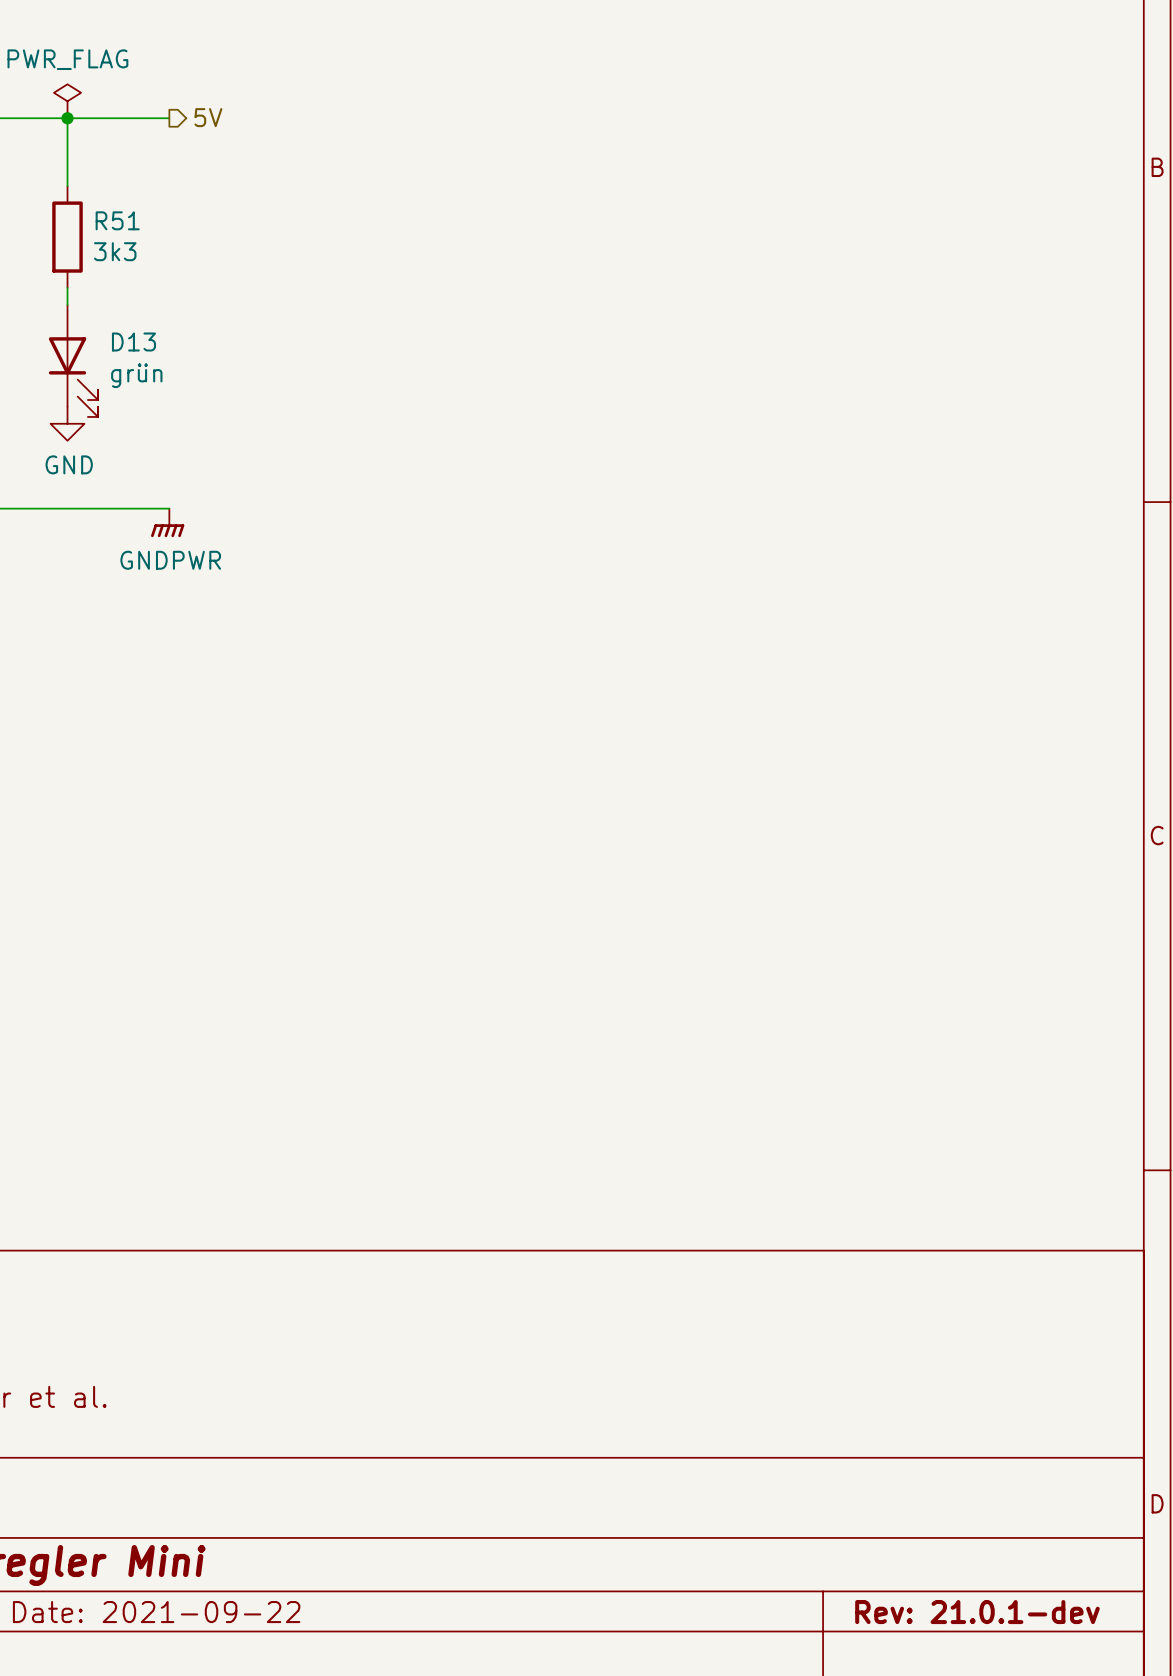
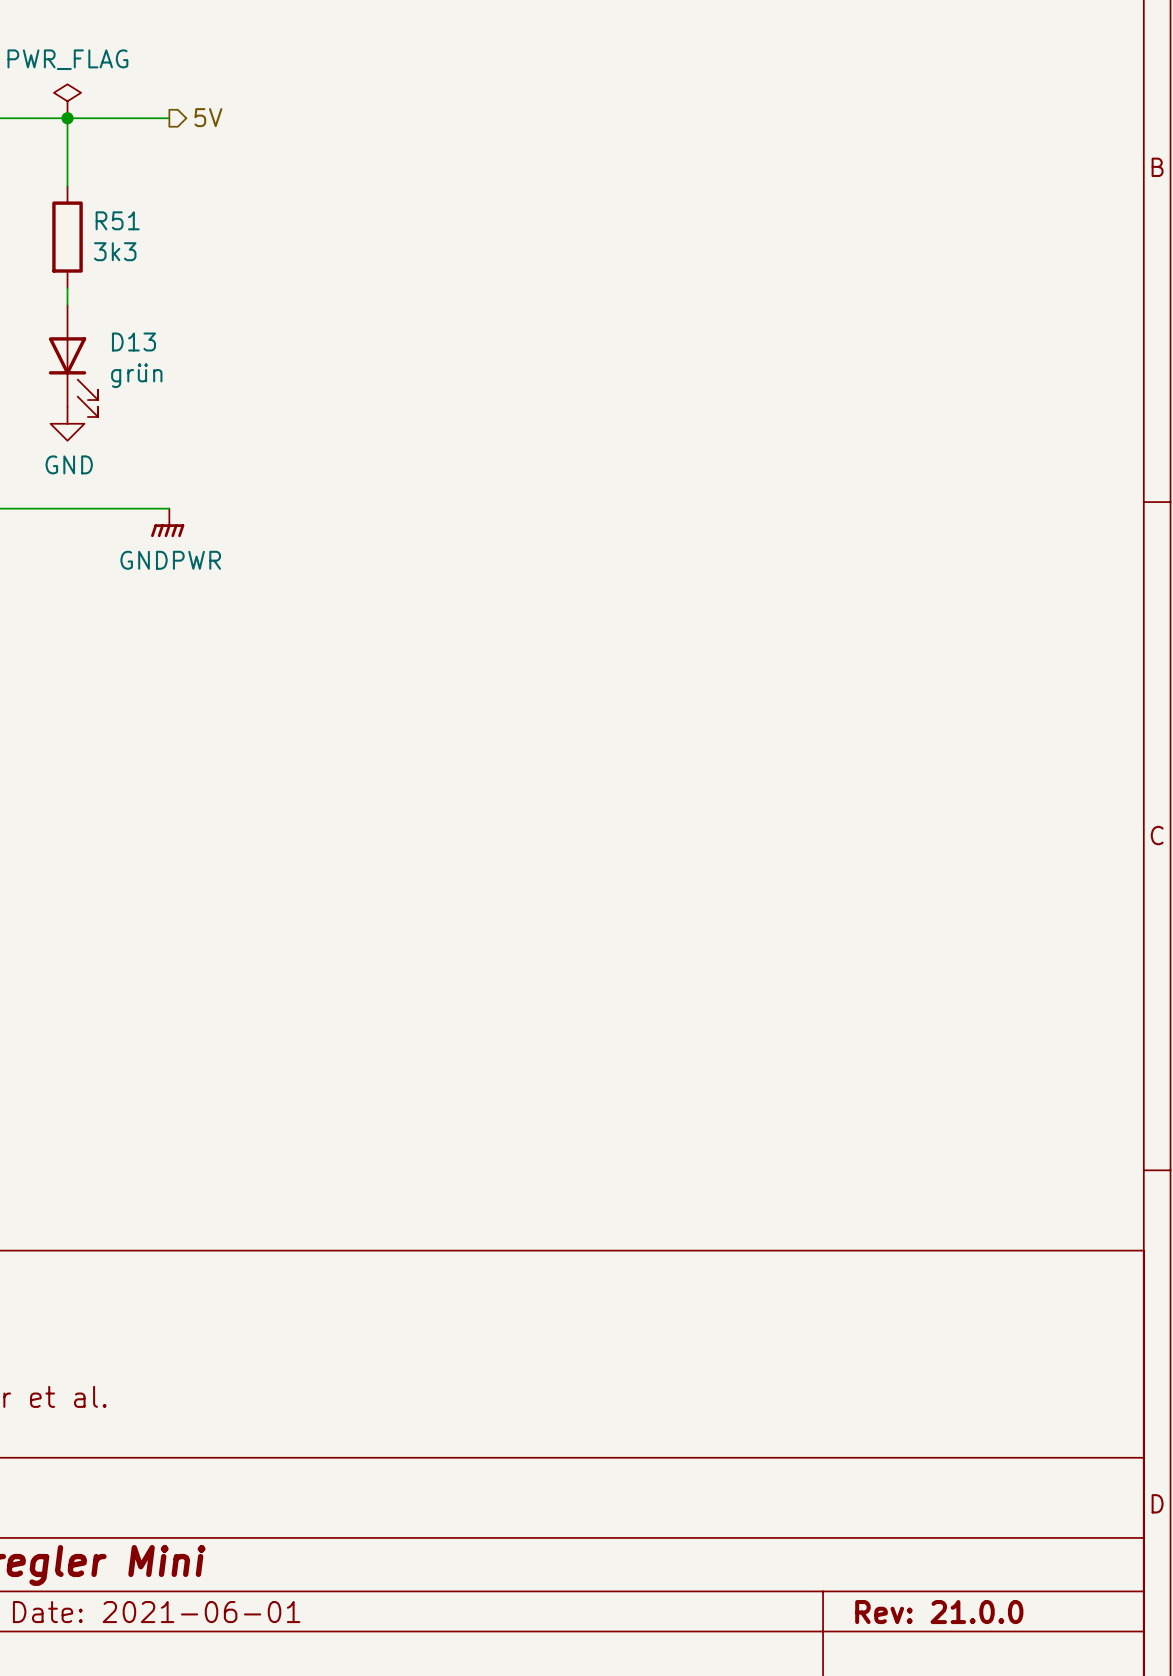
title block: Date: 2021-09-22 (156, 1612) -> Date: 2021-06-01 (156, 1612)
title block: Rev: 21.0.1-dev (977, 1612) -> Rev: 21.0.0 (939, 1612)

